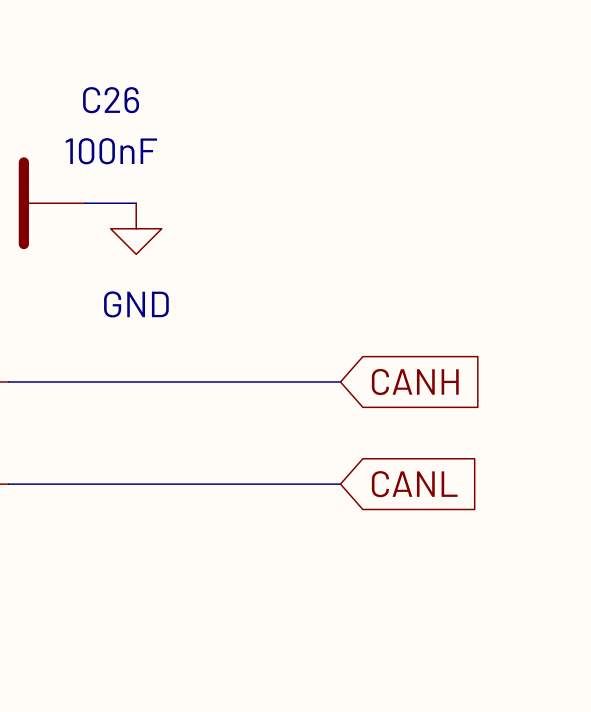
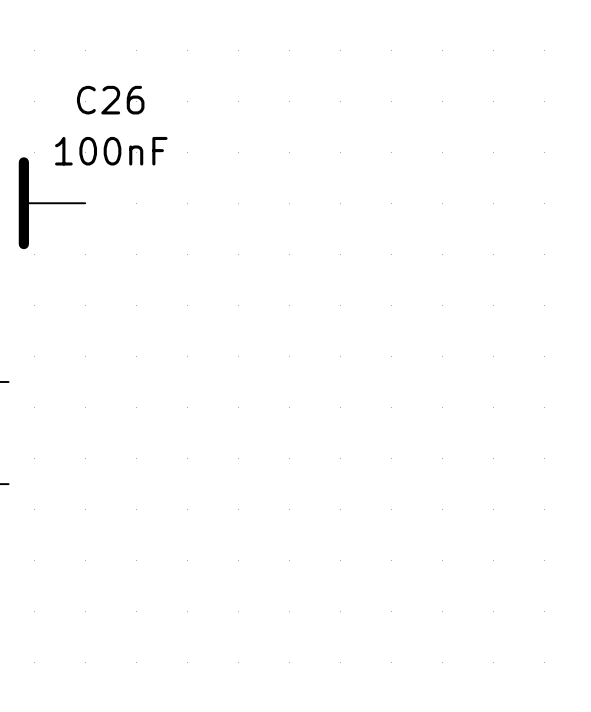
wire: (85, 203) (136, 203) -> none
power symbol: GND (136, 228) -> none
wire: (8, 381) (340, 381) -> none
global label: CANH (415, 382) -> none
wire: (8, 484) (340, 484) -> none
global label: CANL (414, 484) -> none

